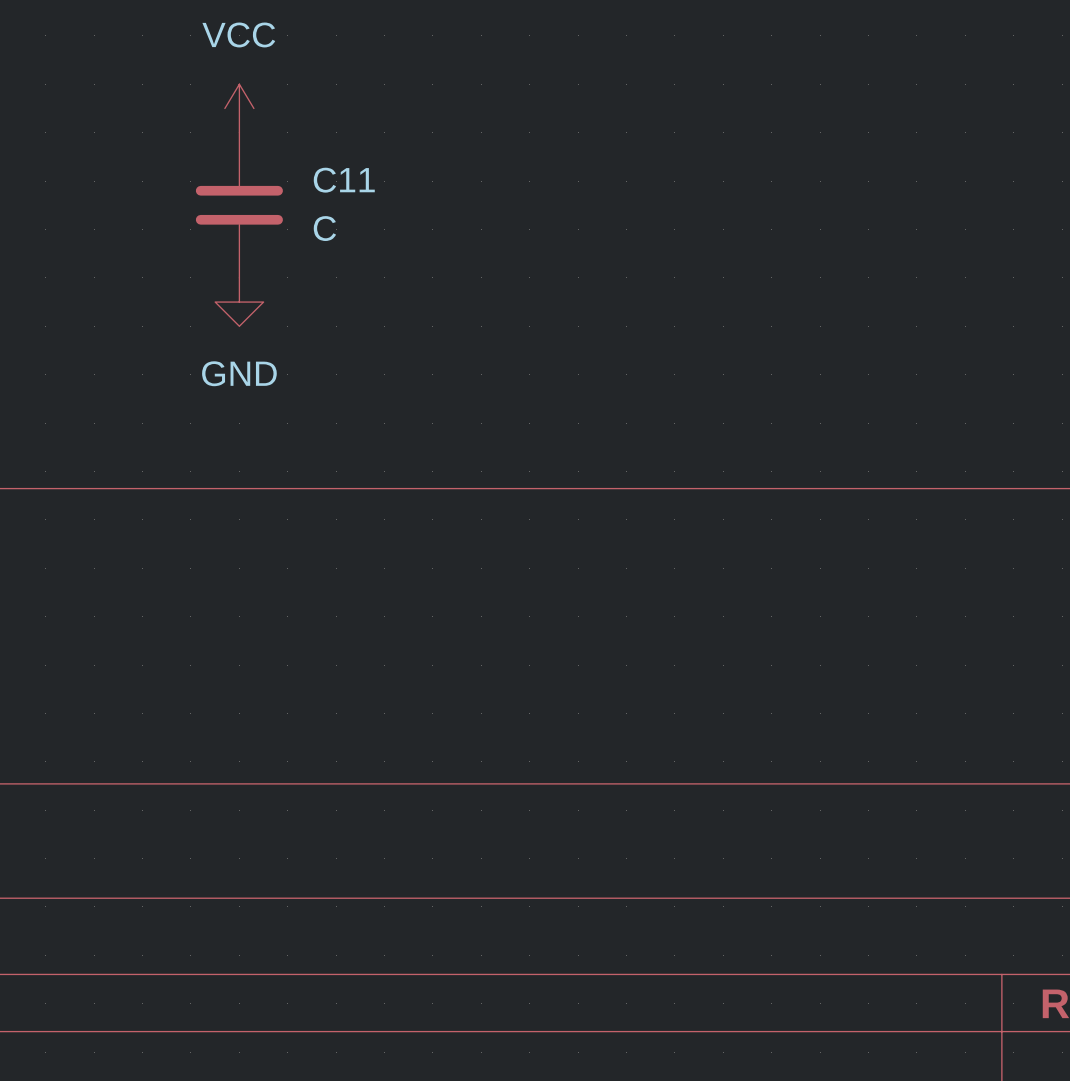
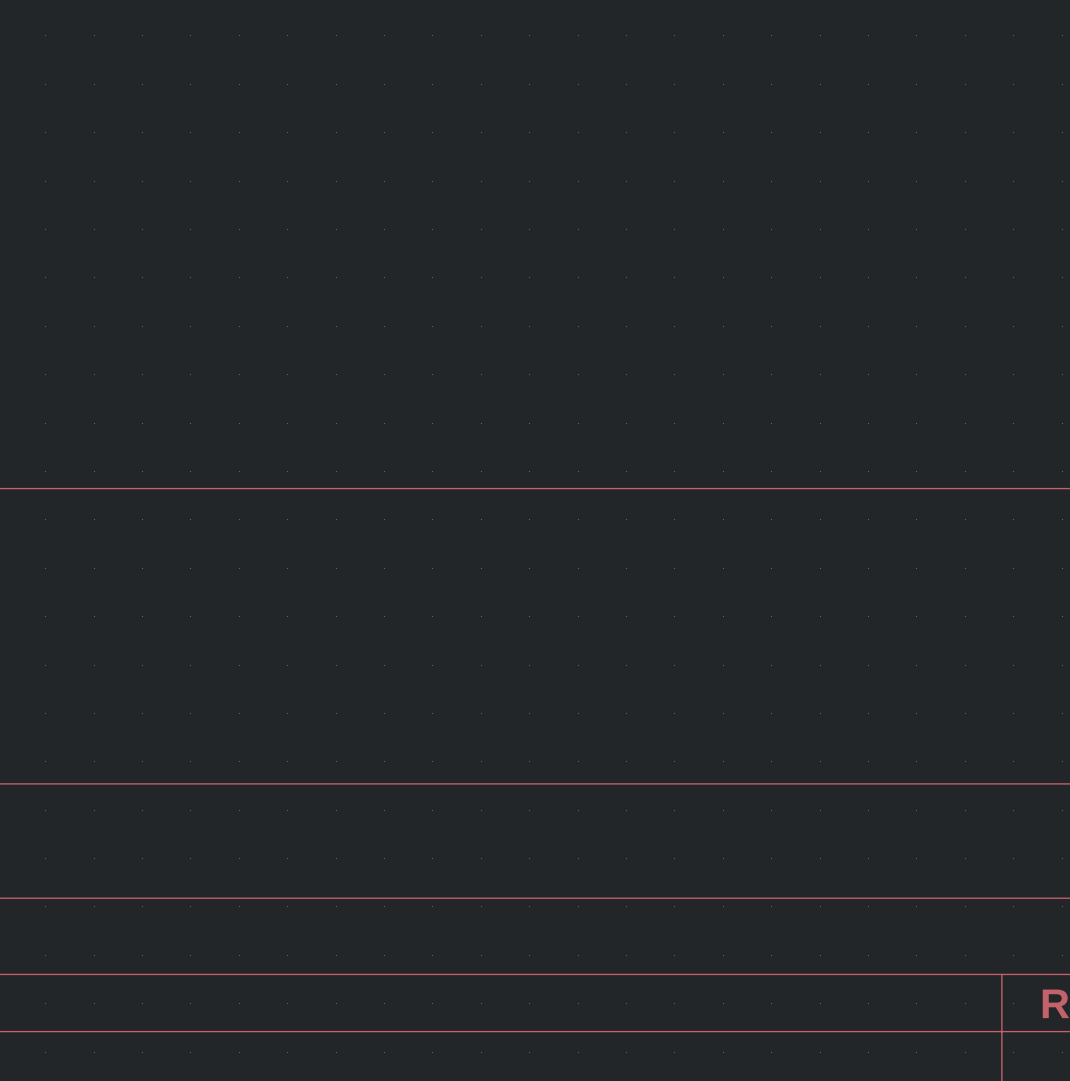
power symbol: VCC (239, 108) -> none
C11: C (239, 205) -> none
power symbol: GND (239, 302) -> none

